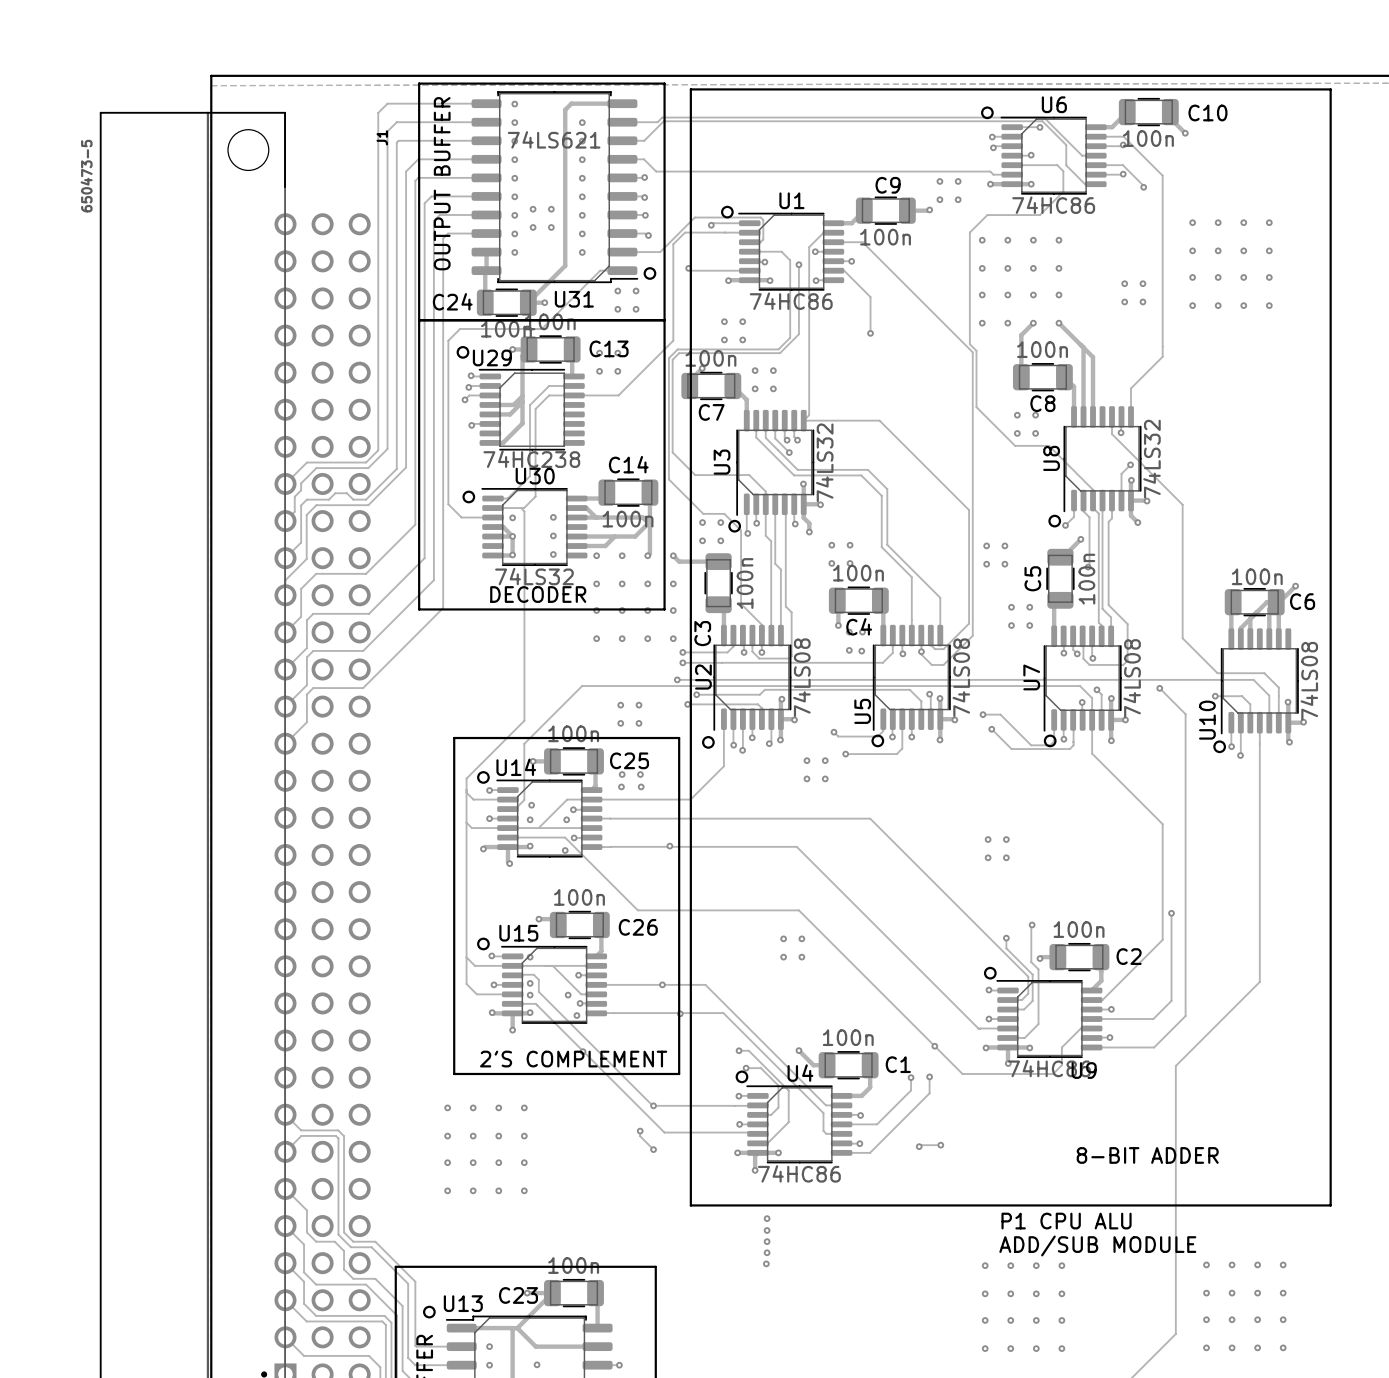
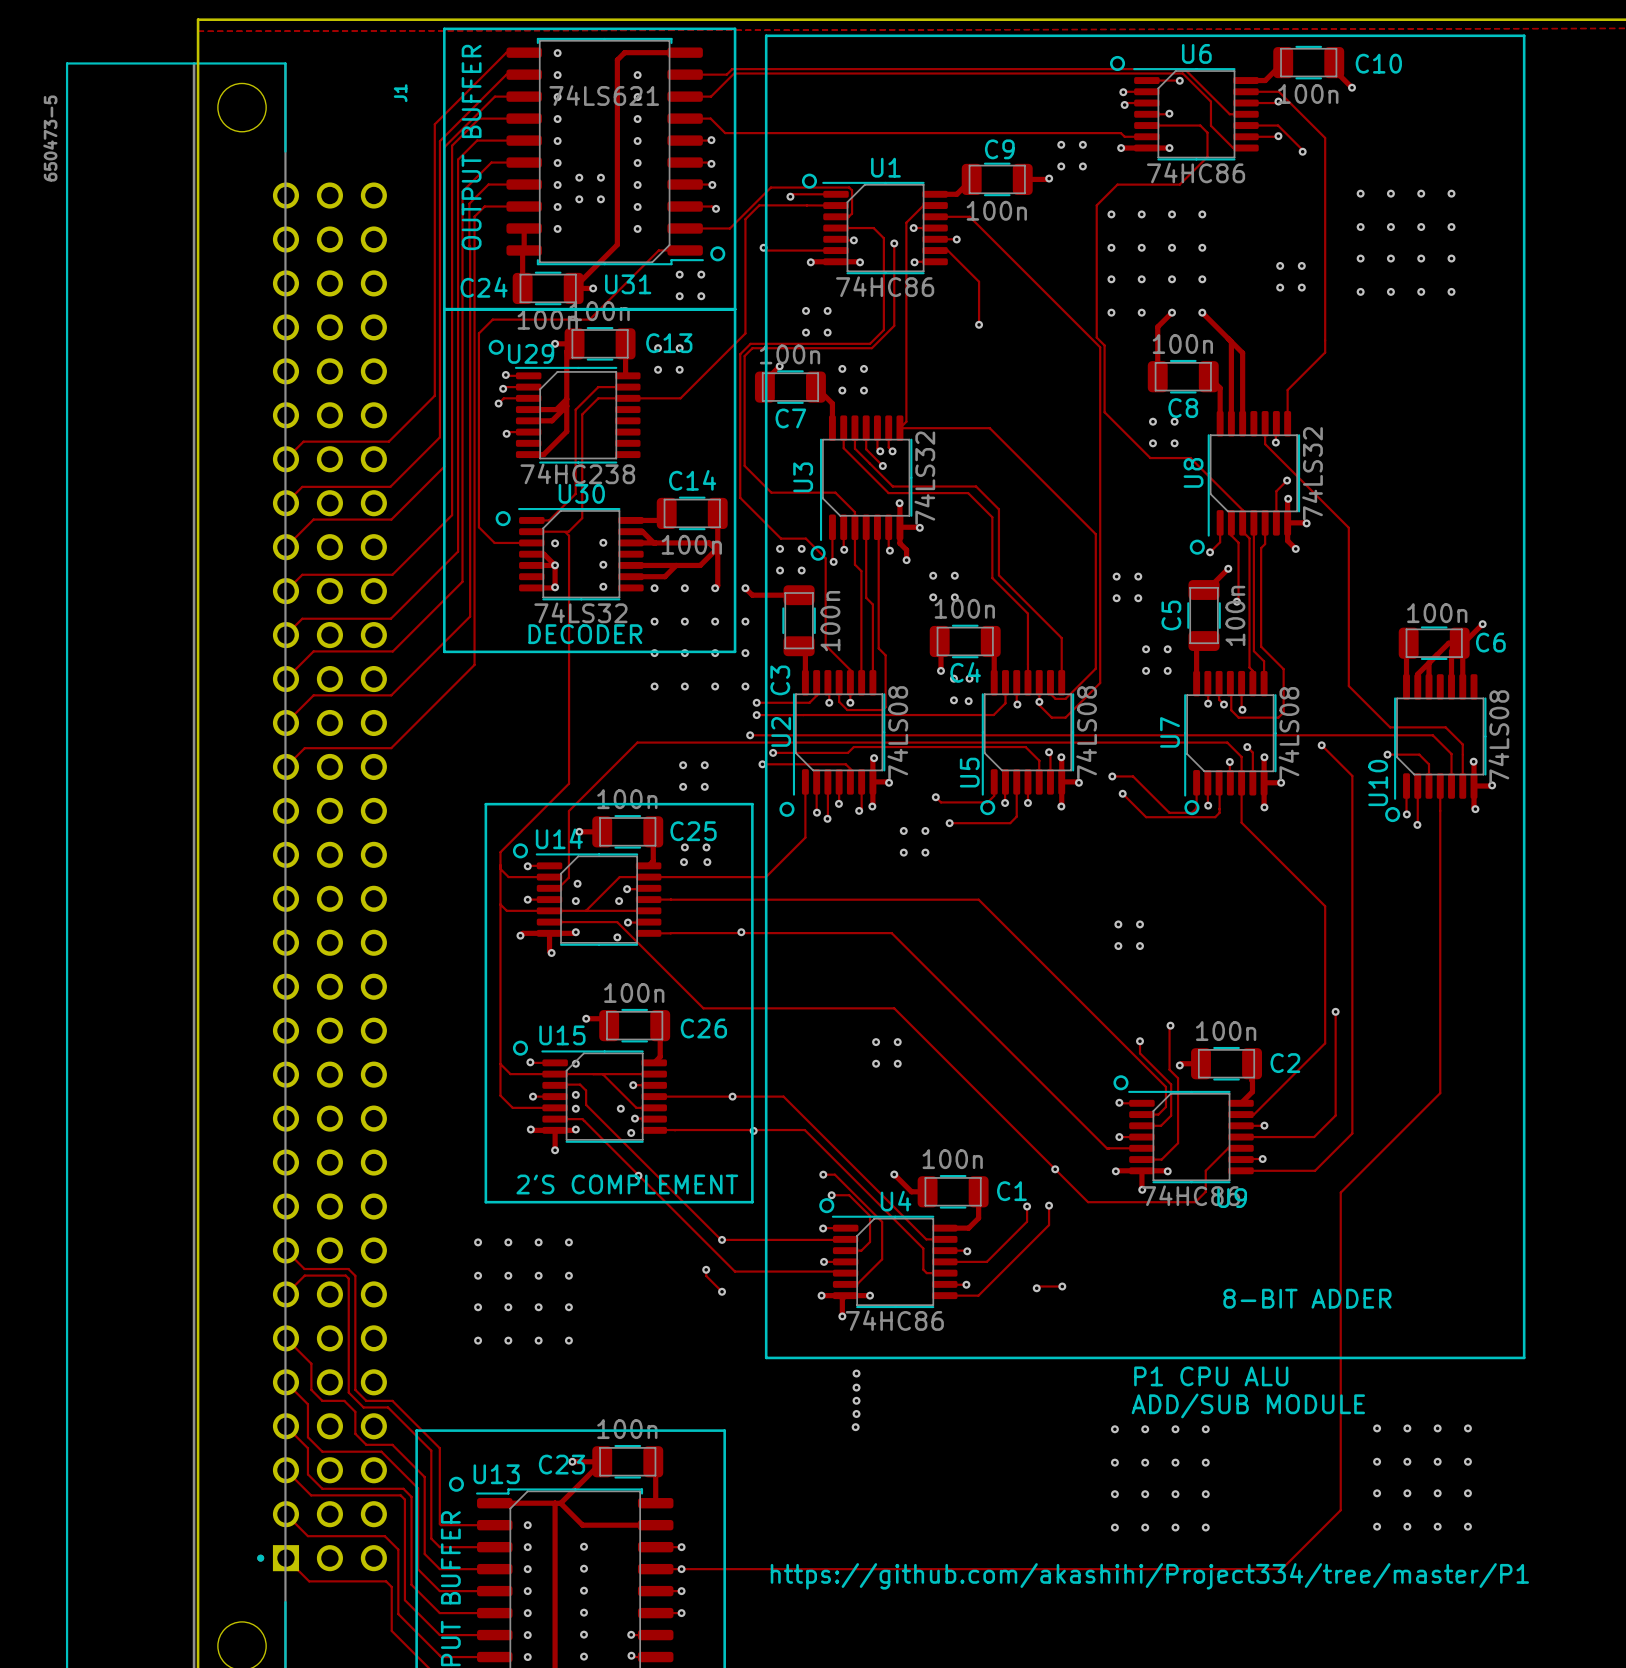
track: (471, 103) (387, 103) (378, 112) (378, 450) (366, 462) (306, 462) (299, 470) -> (506, 74) (439, 141) (439, 437) (390, 486) (302, 486)
track: none -> (506, 52) (434, 124) (434, 395) (388, 441) (303, 441) (285, 459)
track: (471, 122) (396, 122) (387, 131) (387, 448) (368, 468) (316, 468) (301, 483) (301, 490) (294, 496) (294, 511) -> none
track: (461, 140) (398, 140) (396, 142) (396, 468) (366, 499) (353, 499) (346, 493) (335, 493) (328, 499) (306, 499) -> (494, 96) (444, 147) (444, 466) (391, 519) (313, 519) (311, 521)
track: (448, 159) (418, 159) (406, 171) (406, 467) (368, 505) (316, 505) (306, 514) (306, 559) (285, 580) (285, 595) -> (477, 140) (458, 159) (458, 551) (390, 618) (302, 618) (285, 635)
track: none -> (479, 118) (452, 145) (452, 515) (392, 574) (302, 574)
track: (446, 177) (418, 177) (415, 180) (415, 524) (366, 573) (316, 573) (301, 588) (301, 616) -> (491, 162) (462, 191) (462, 581) (392, 651) (313, 651) (304, 660)
track: (458, 196) (431, 196) (424, 203) (424, 558) (368, 613) (313, 613) (306, 620) (306, 648) -> (488, 184) (469, 203) (470, 616) (391, 695) (313, 695) (311, 697)
track: (456, 214) (439, 214) (433, 220) (433, 580) (363, 650) (313, 650) (306, 657) (306, 685) (301, 690) -> (484, 206) (474, 216) (474, 664) (391, 748) (304, 748)
track: (453, 233) (448, 233) (443, 238) (443, 608) (363, 688) (313, 688) (306, 694) (306, 722) (285, 743) -> none
track: (301, 505) (301, 542) (299, 544) -> (304, 528) (296, 536)

